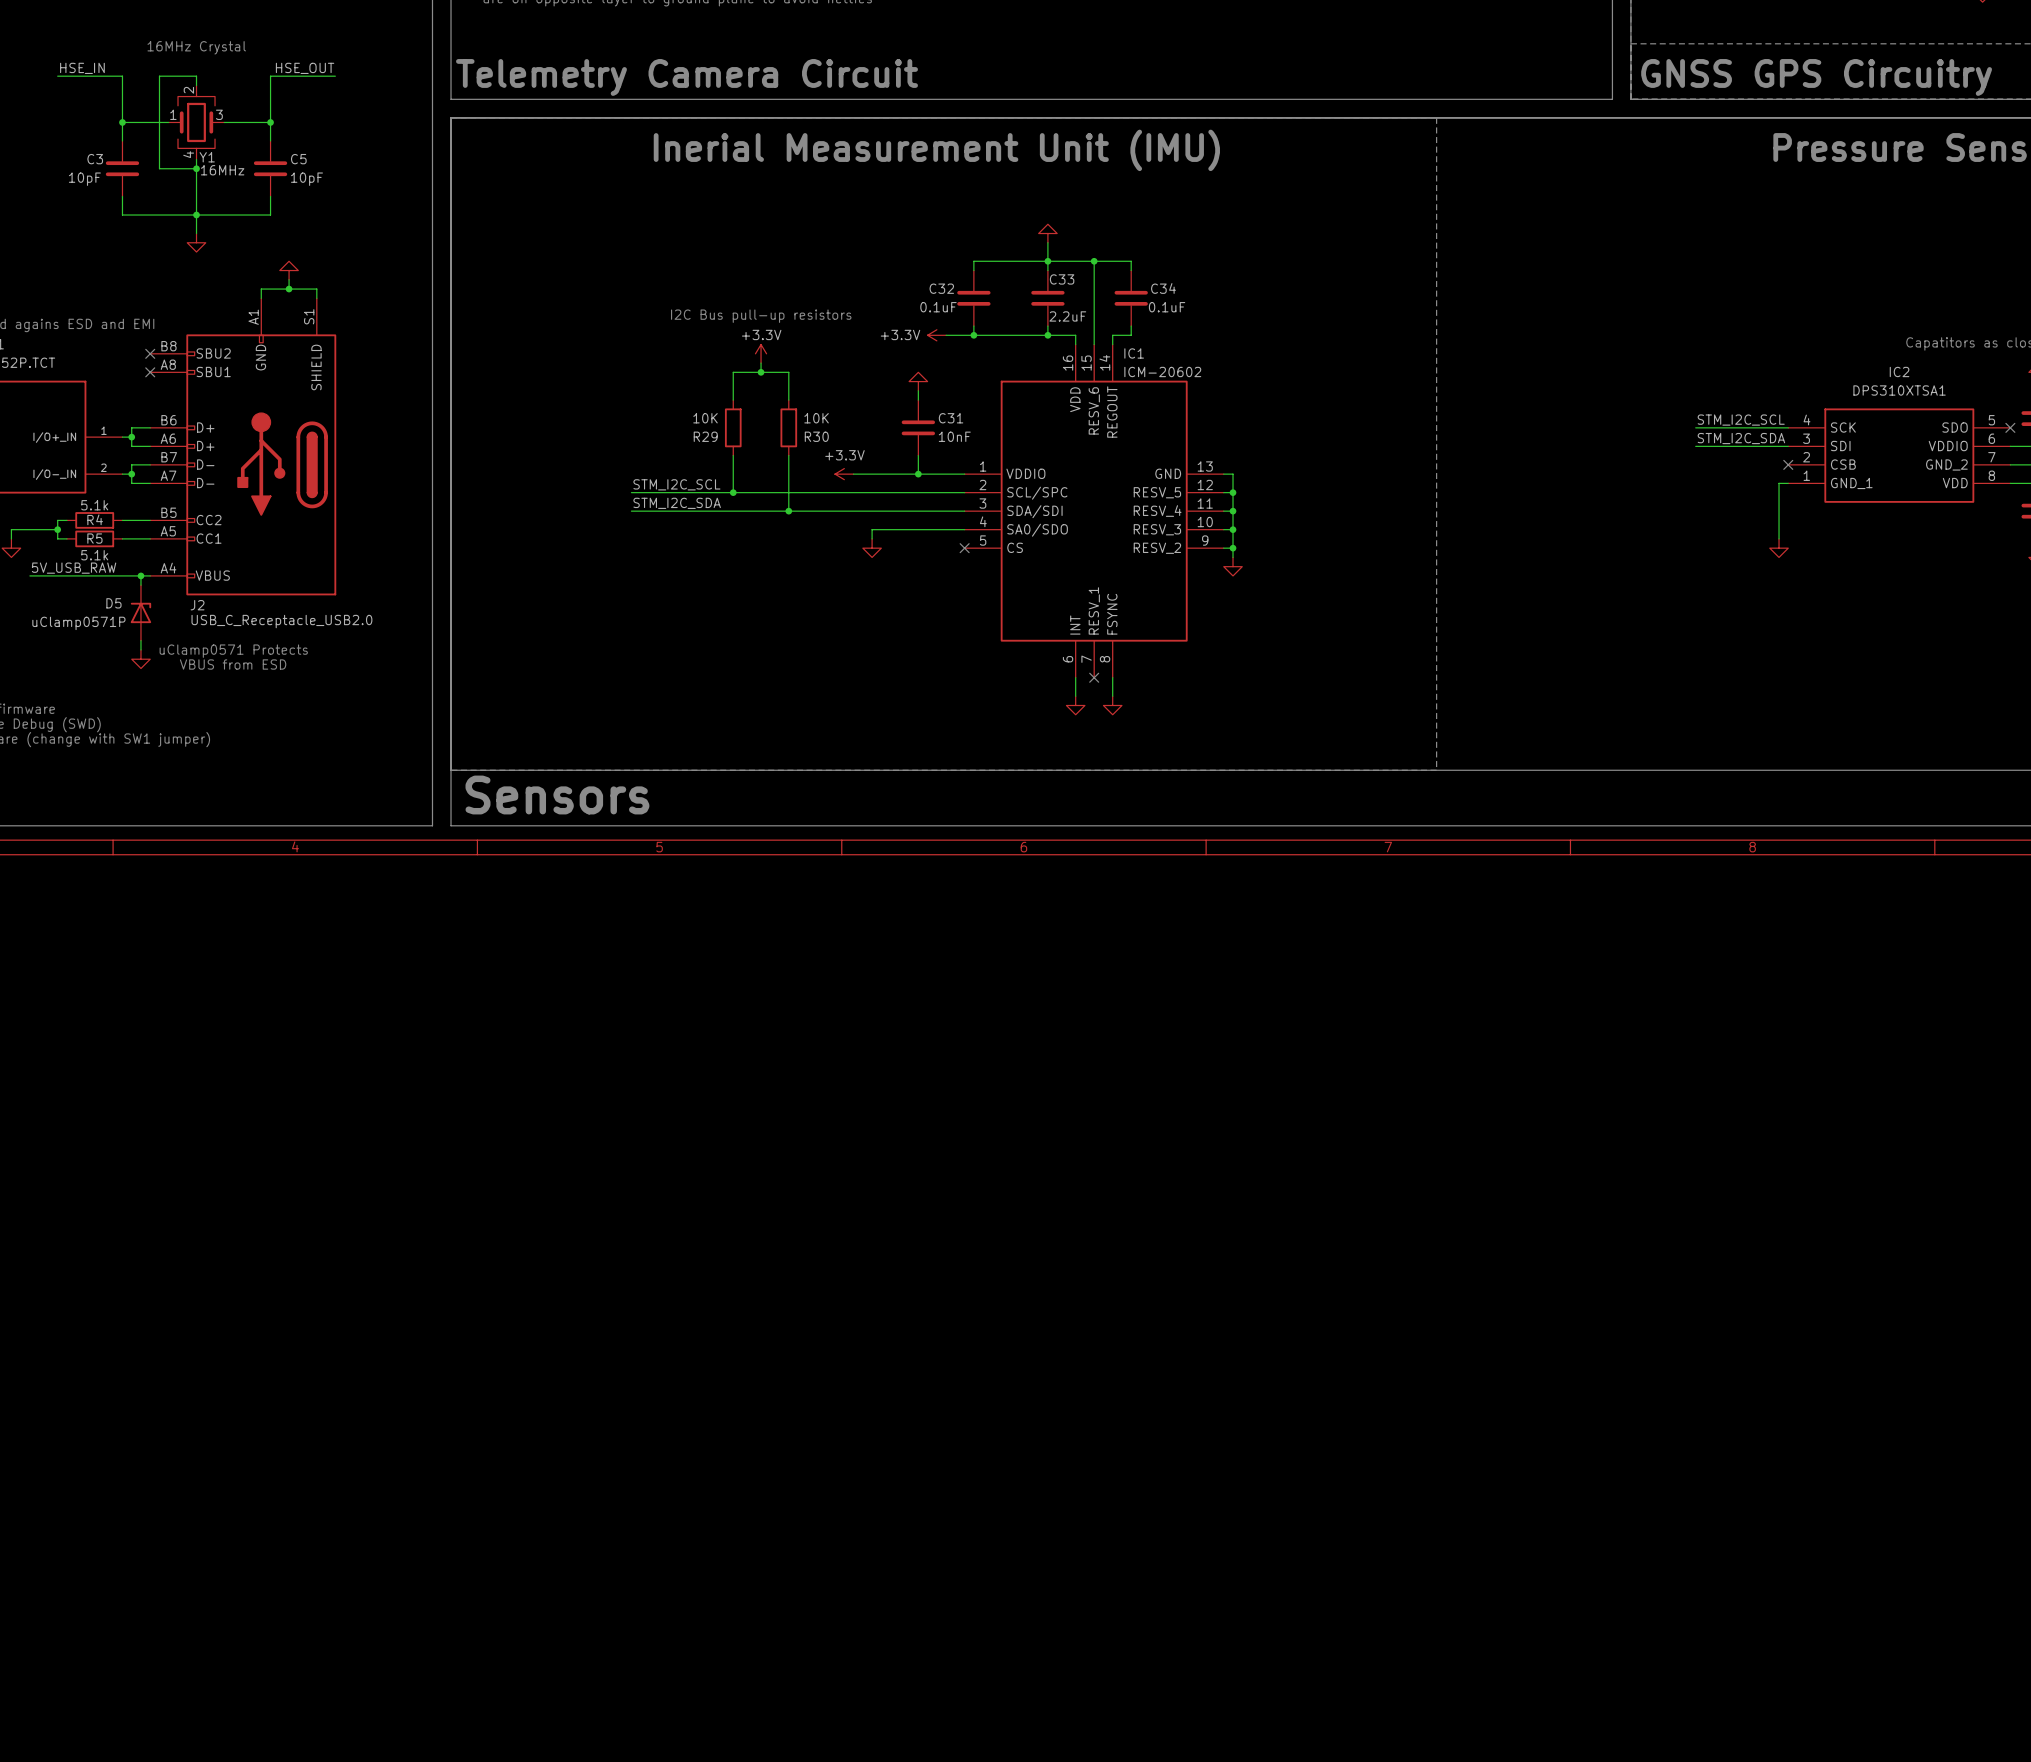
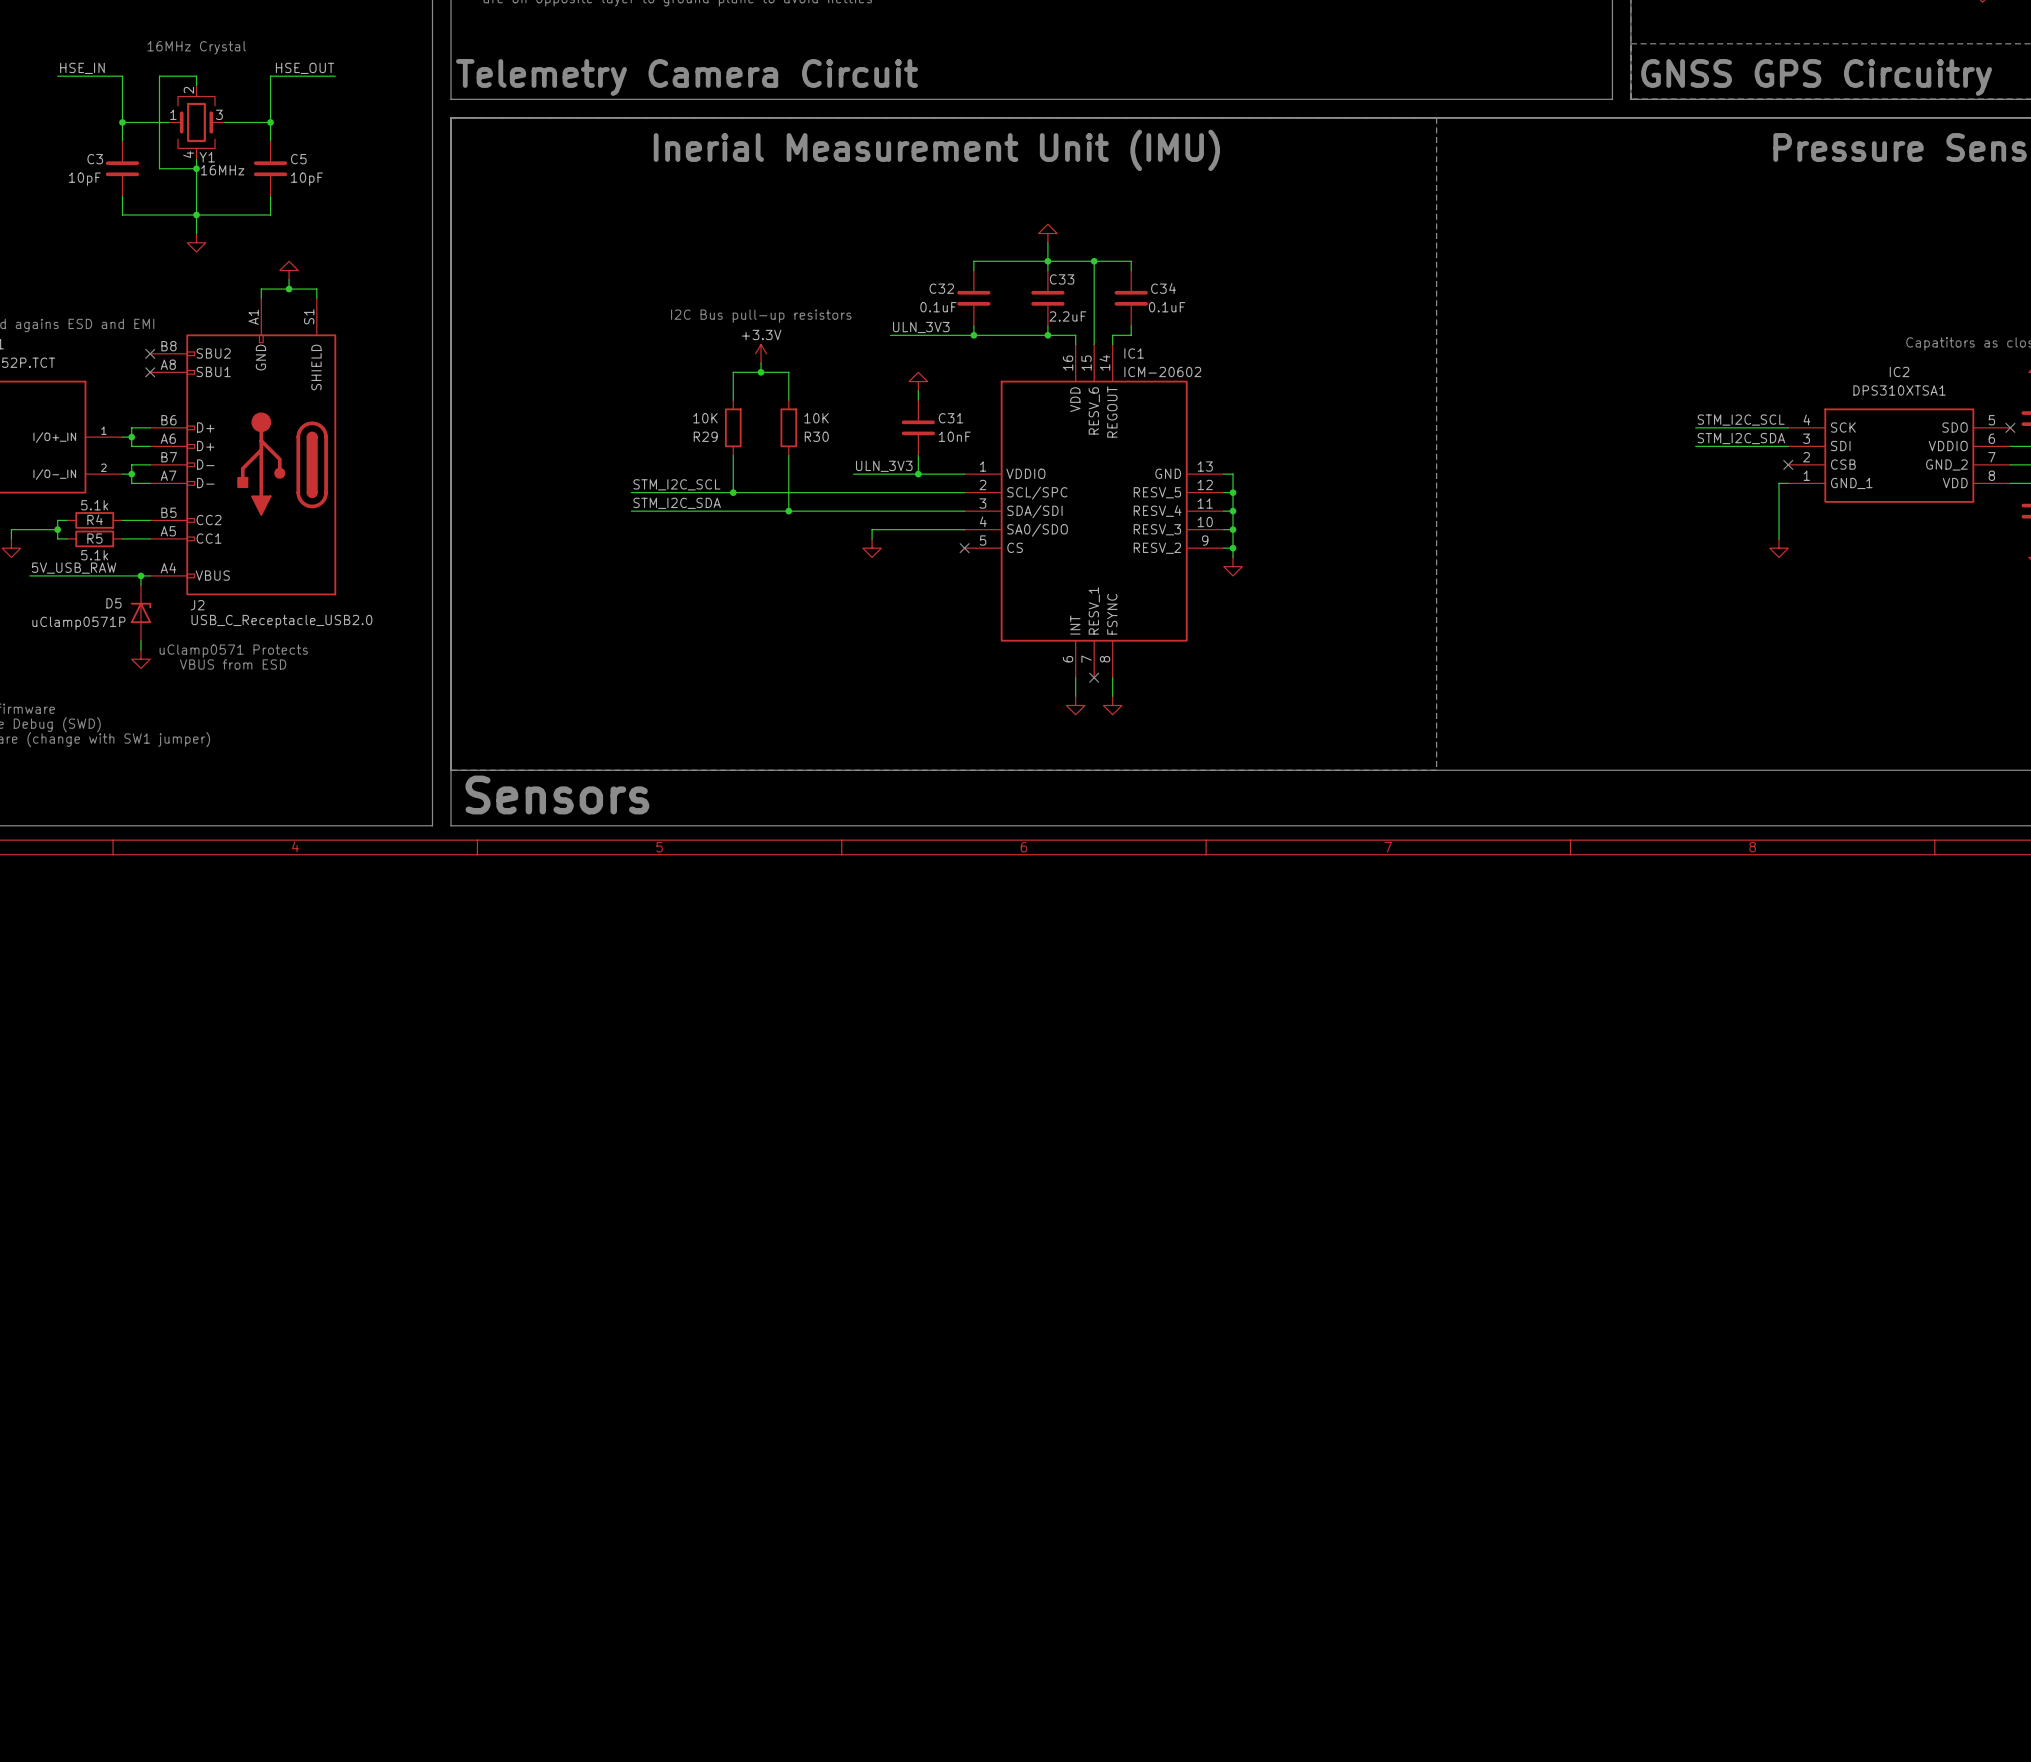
label: none -> ULN_3V3 (921, 327)
wire: none -> (890, 335) (946, 335)
power symbol: +3.3V (936, 335) -> none
label: none -> ULN_3V3 (884, 466)
power symbol: +3.3V (844, 474) -> none

